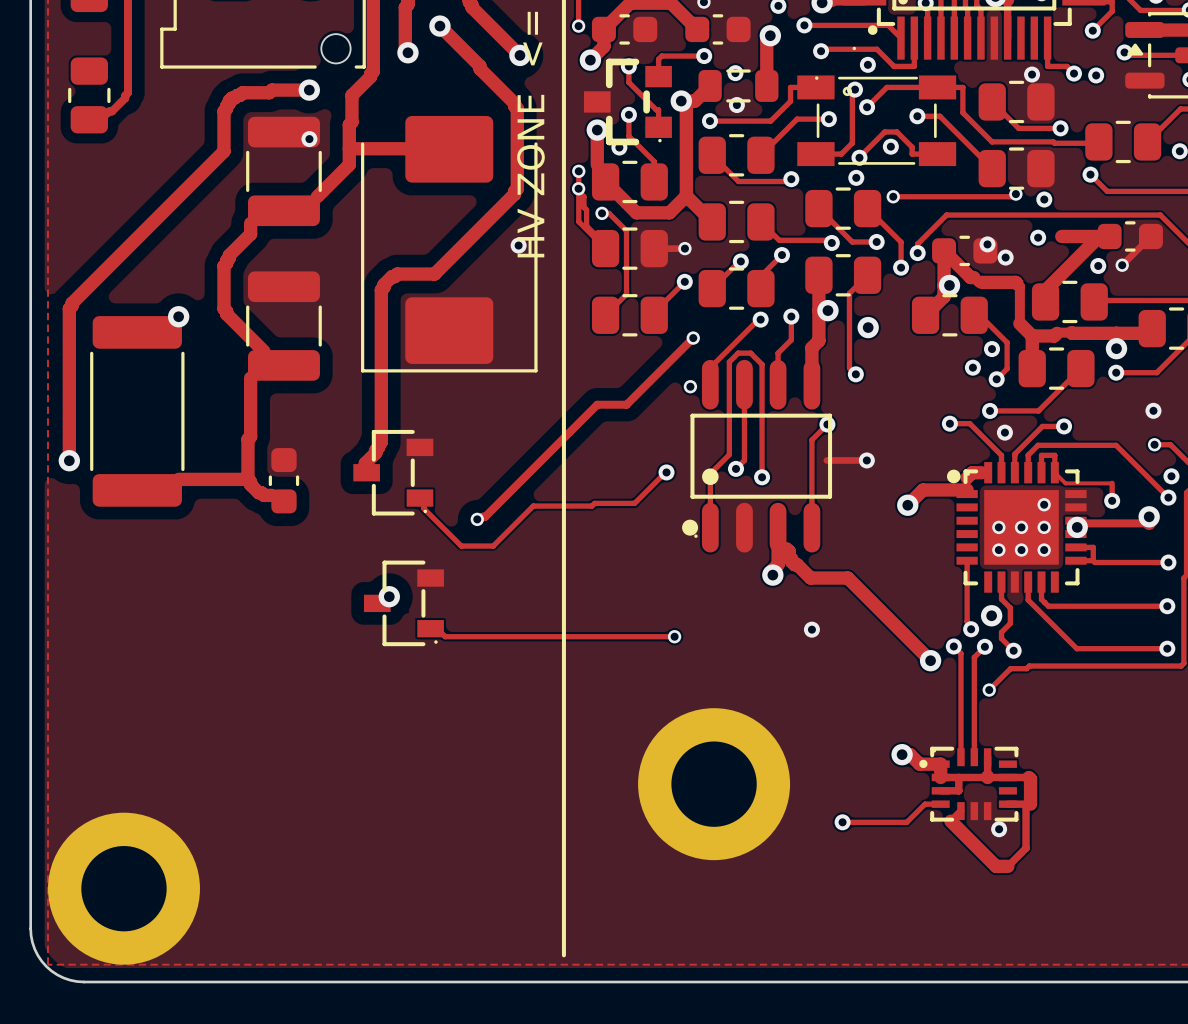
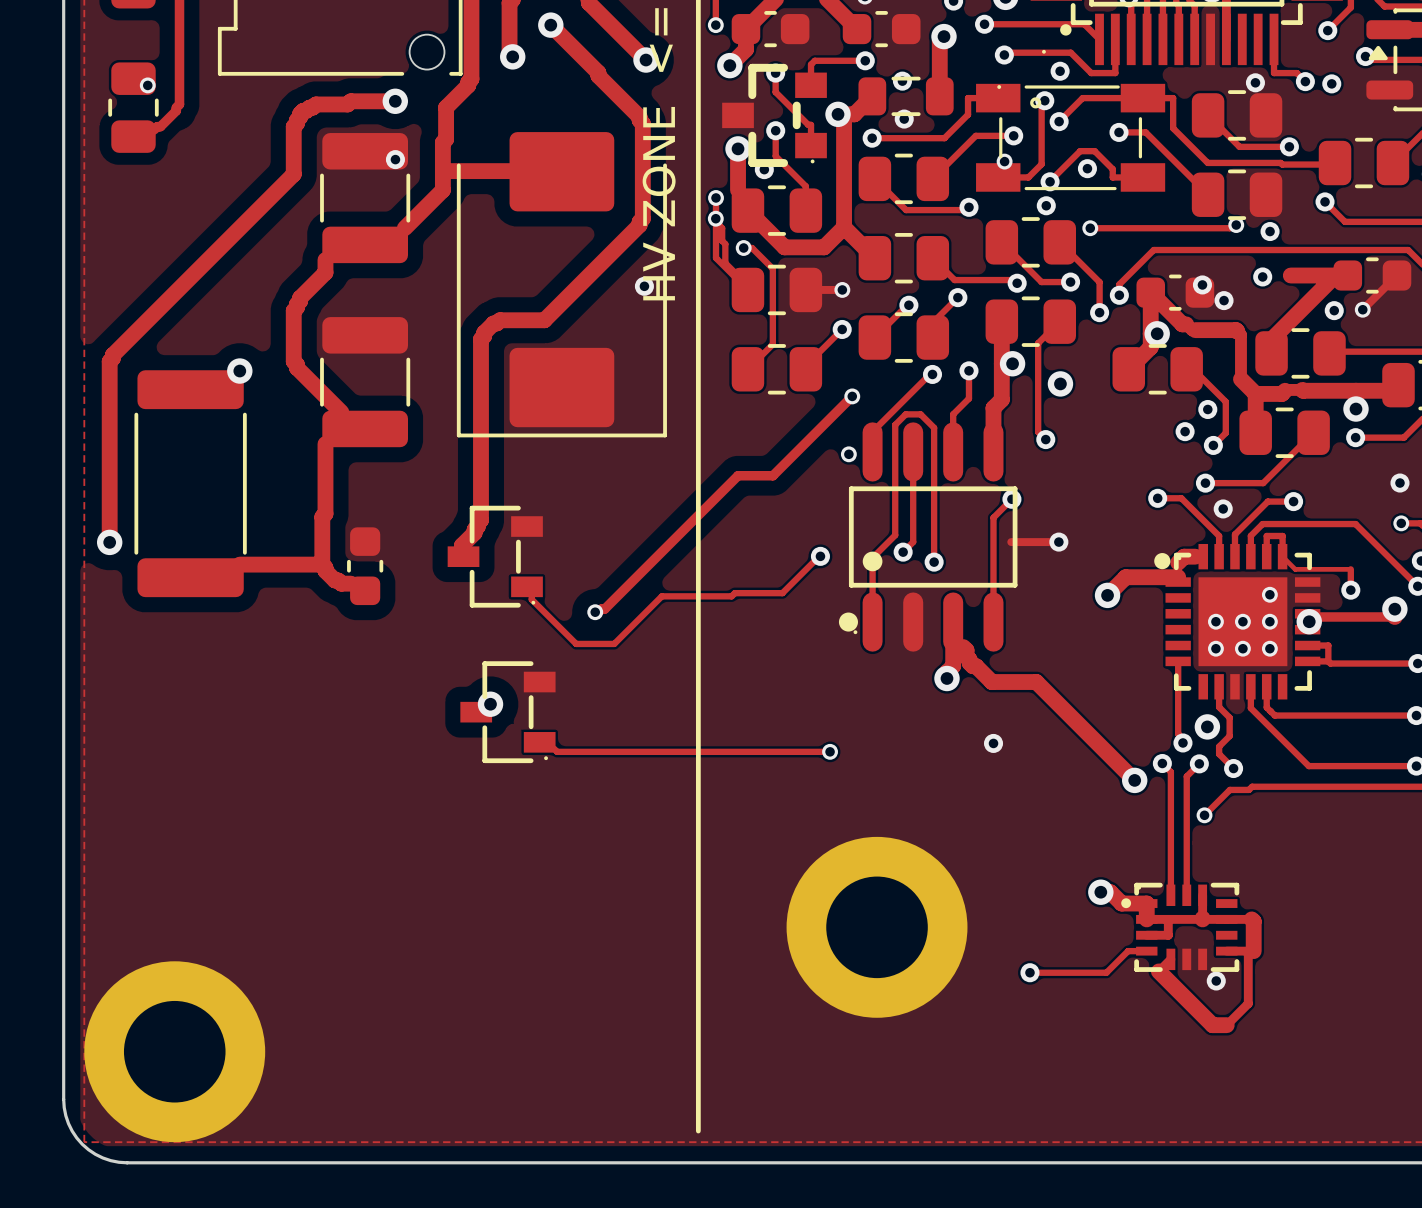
via: none -> (147, 85)
via: none -> (1004, 161)

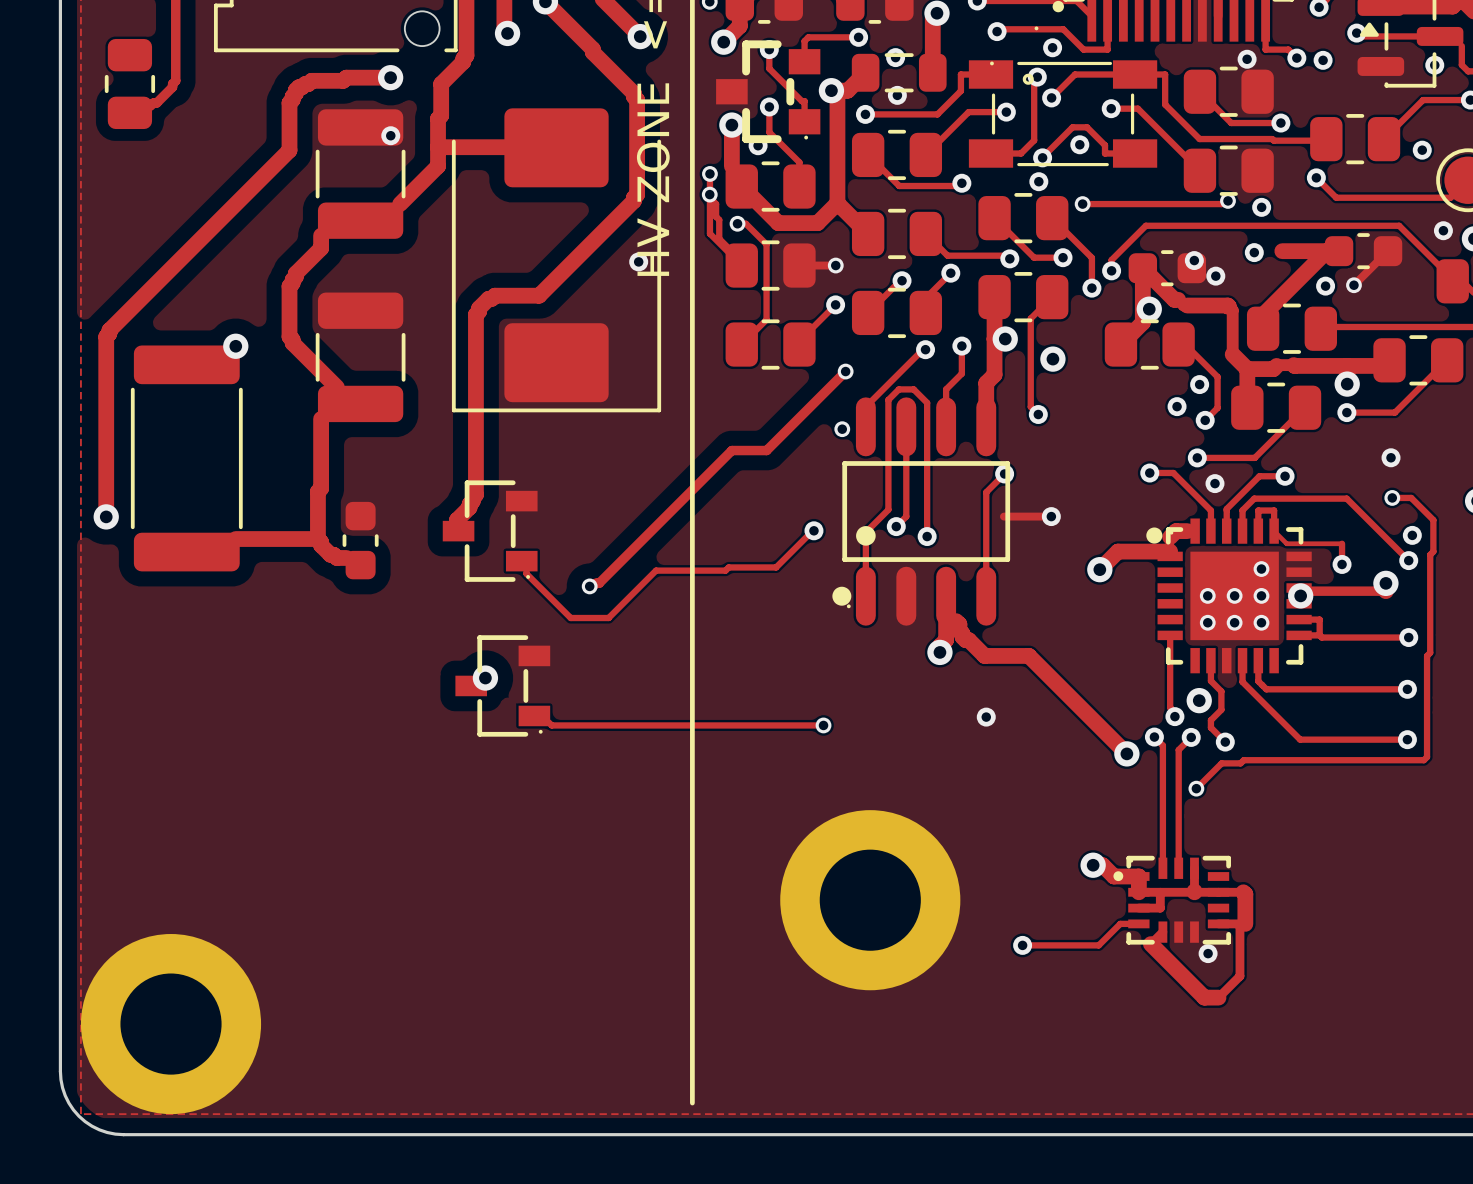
via: (147, 85) -> none
via: (1004, 161) -> none

